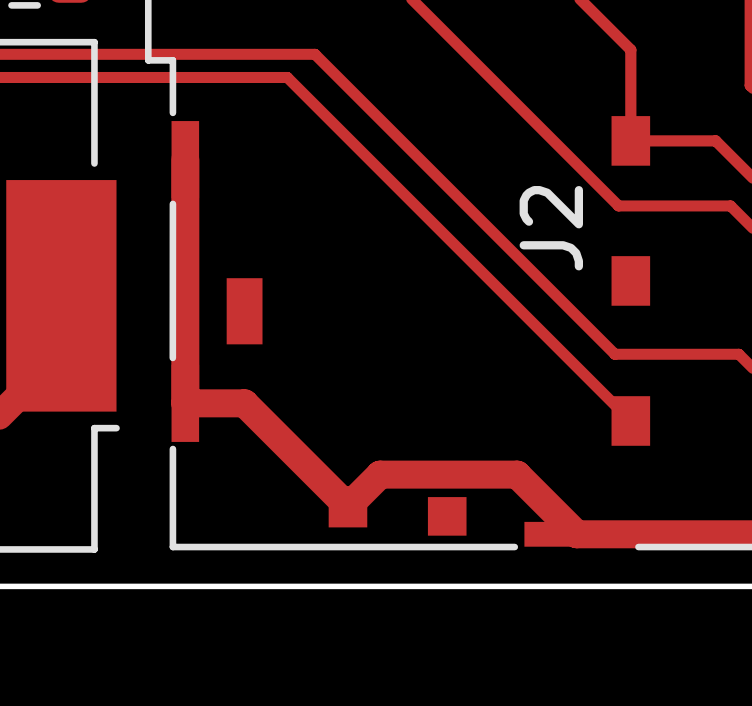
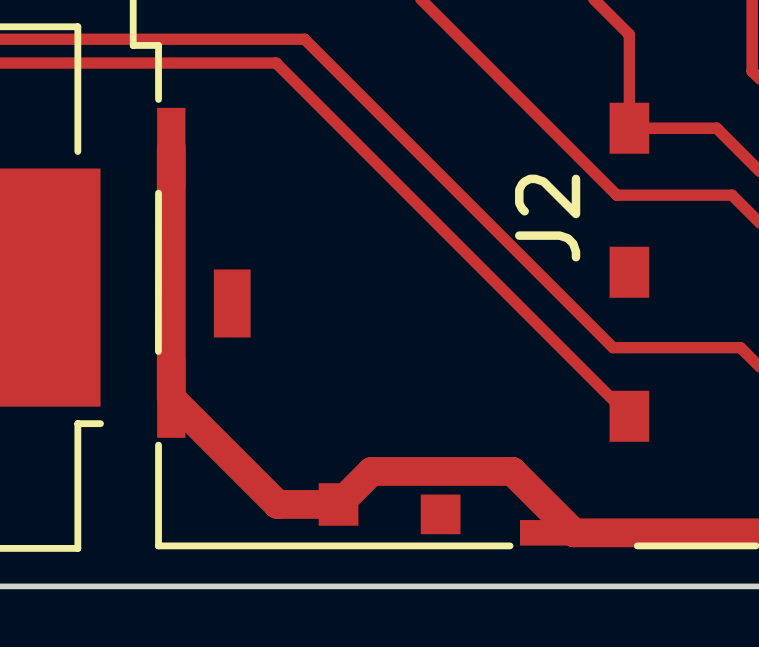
track: (185, 403) (244, 403) (347, 506) -> (171, 398) (277, 504) (338, 504)

